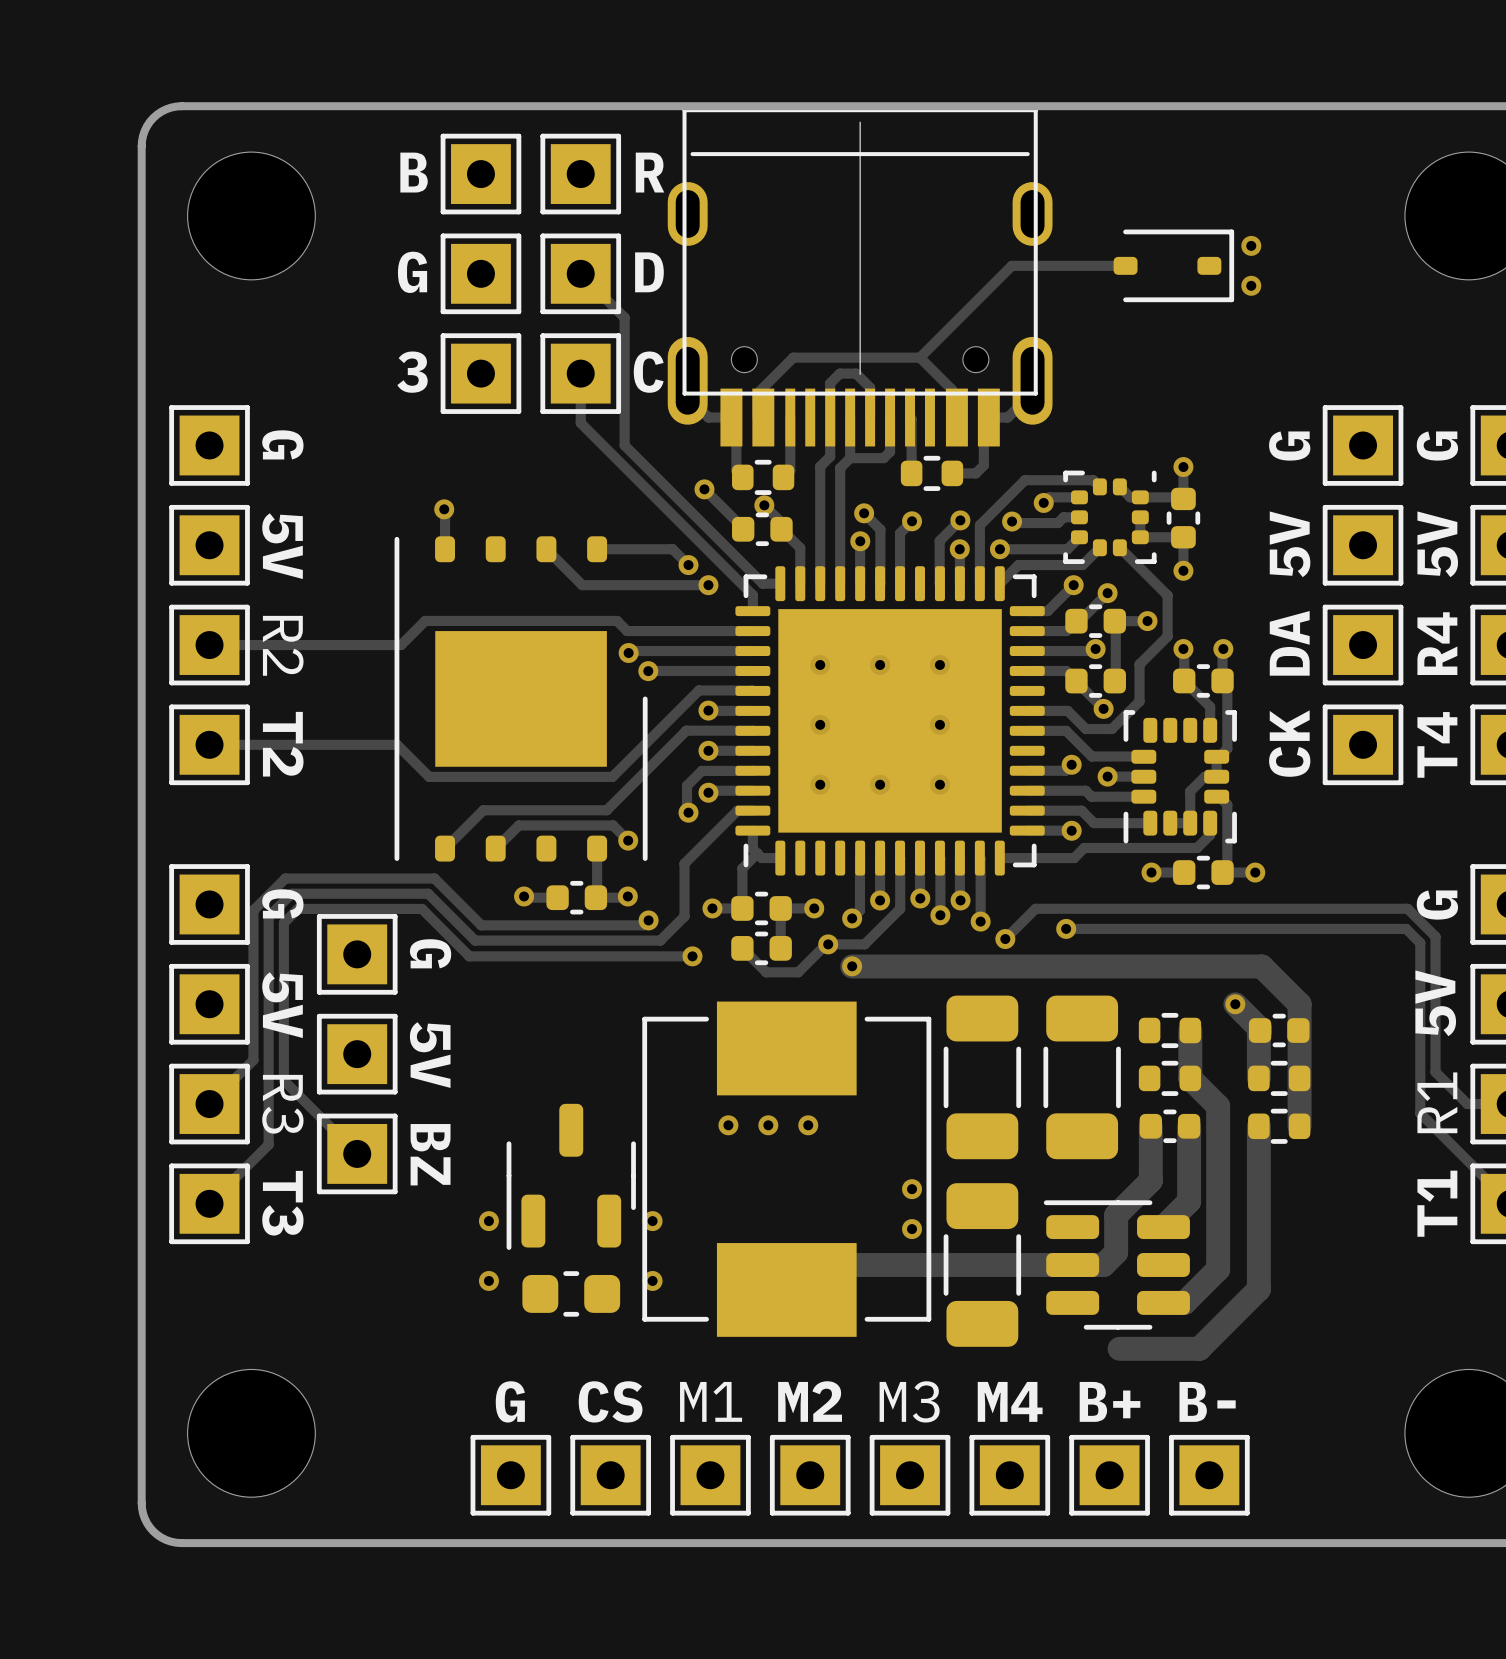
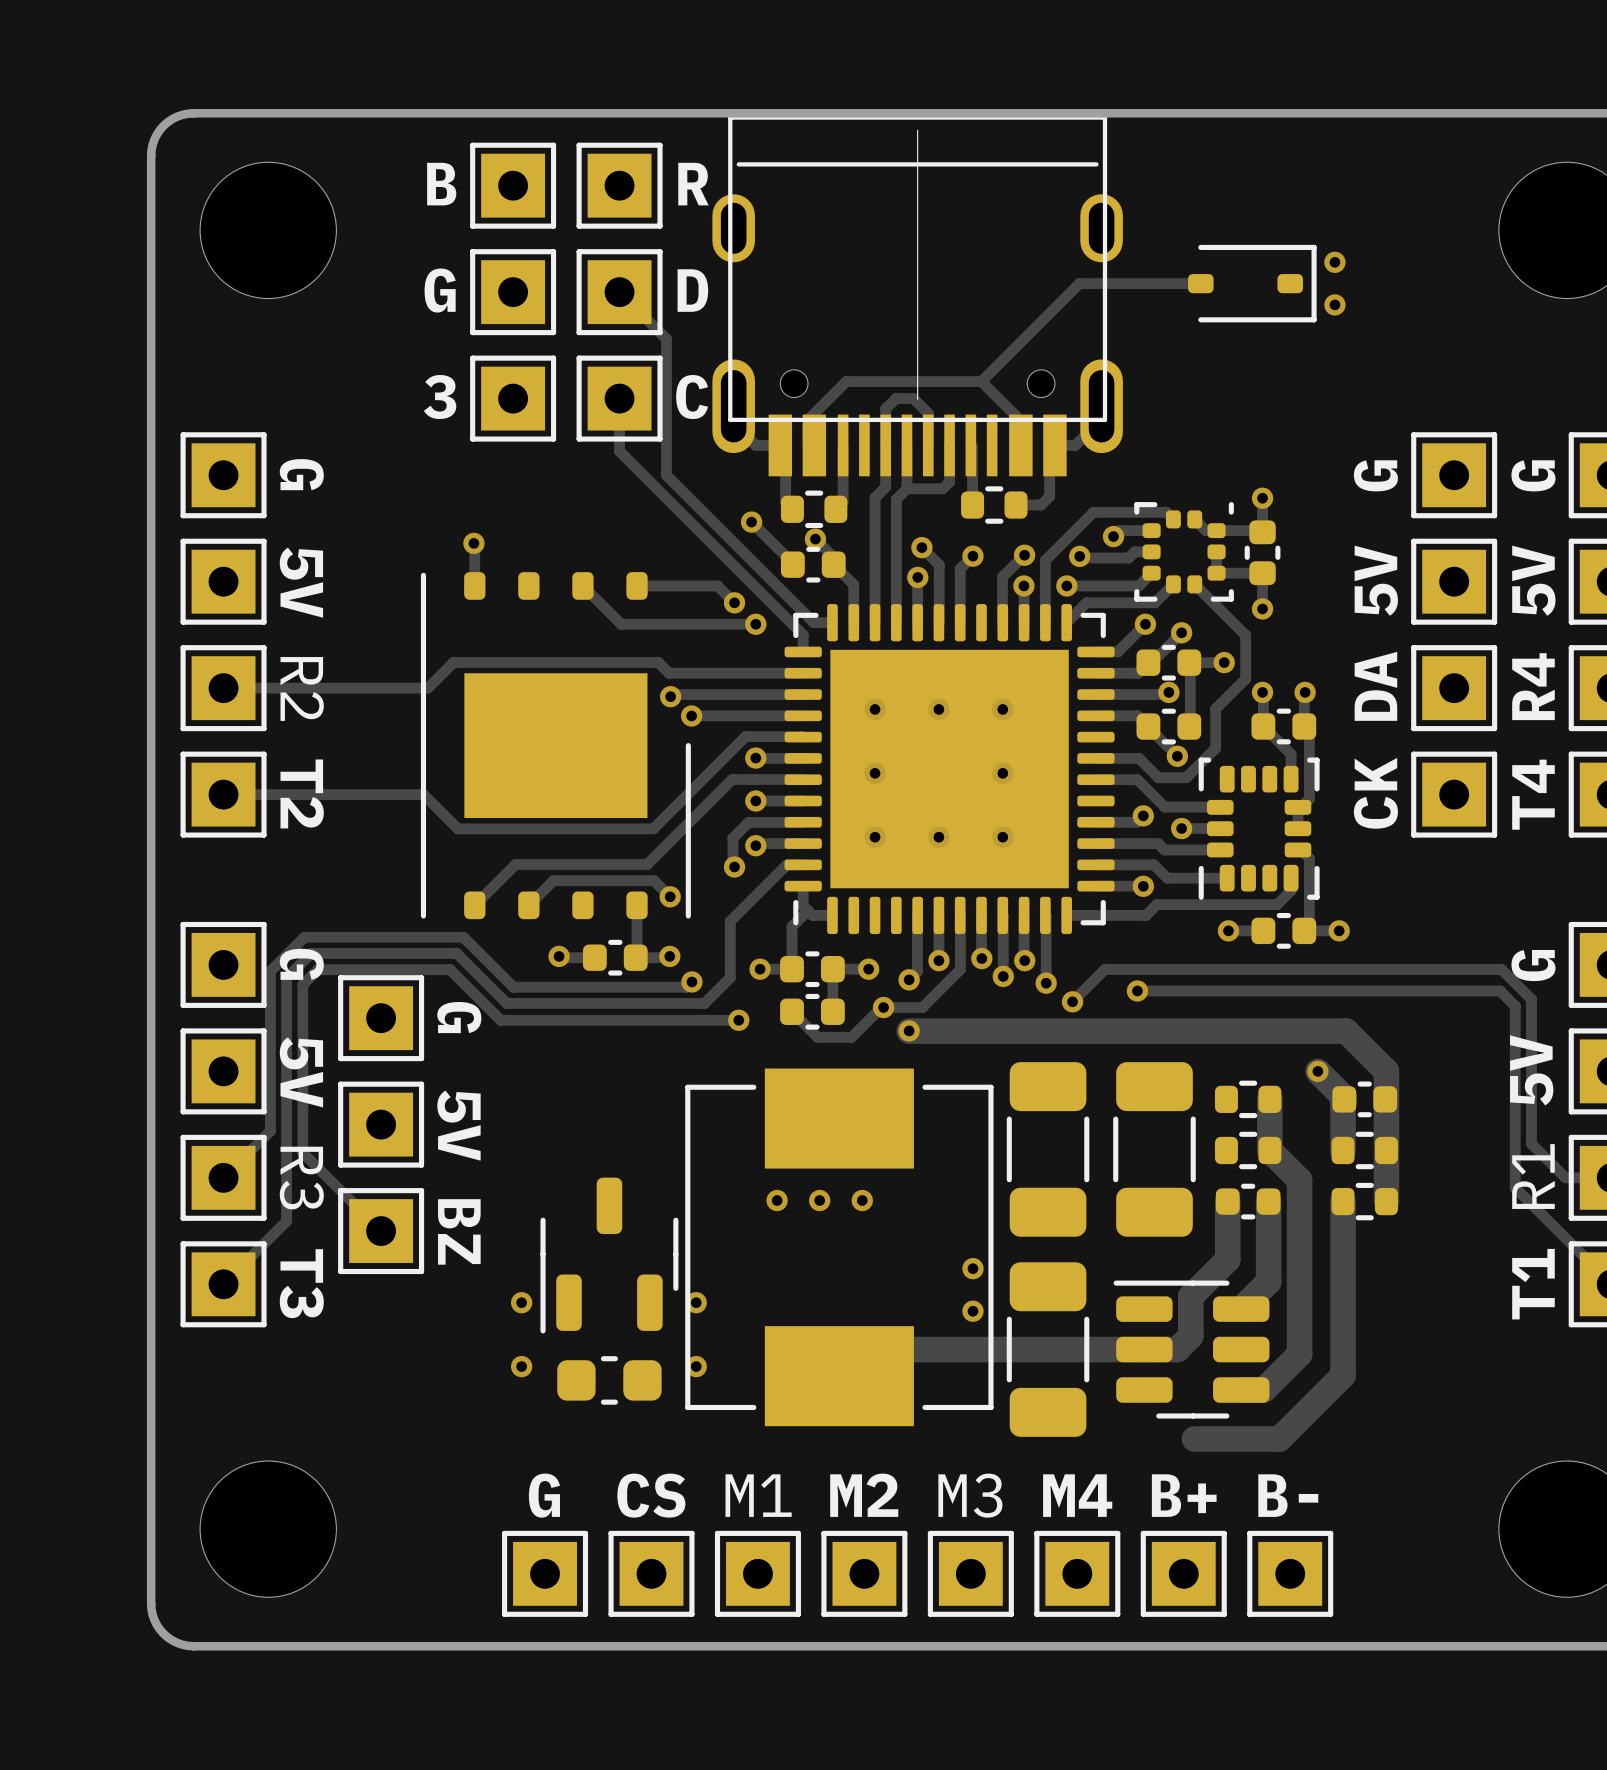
track: (1216, 776) (1204, 776) (1190, 791) (1190, 823) (1170, 823) -> none

